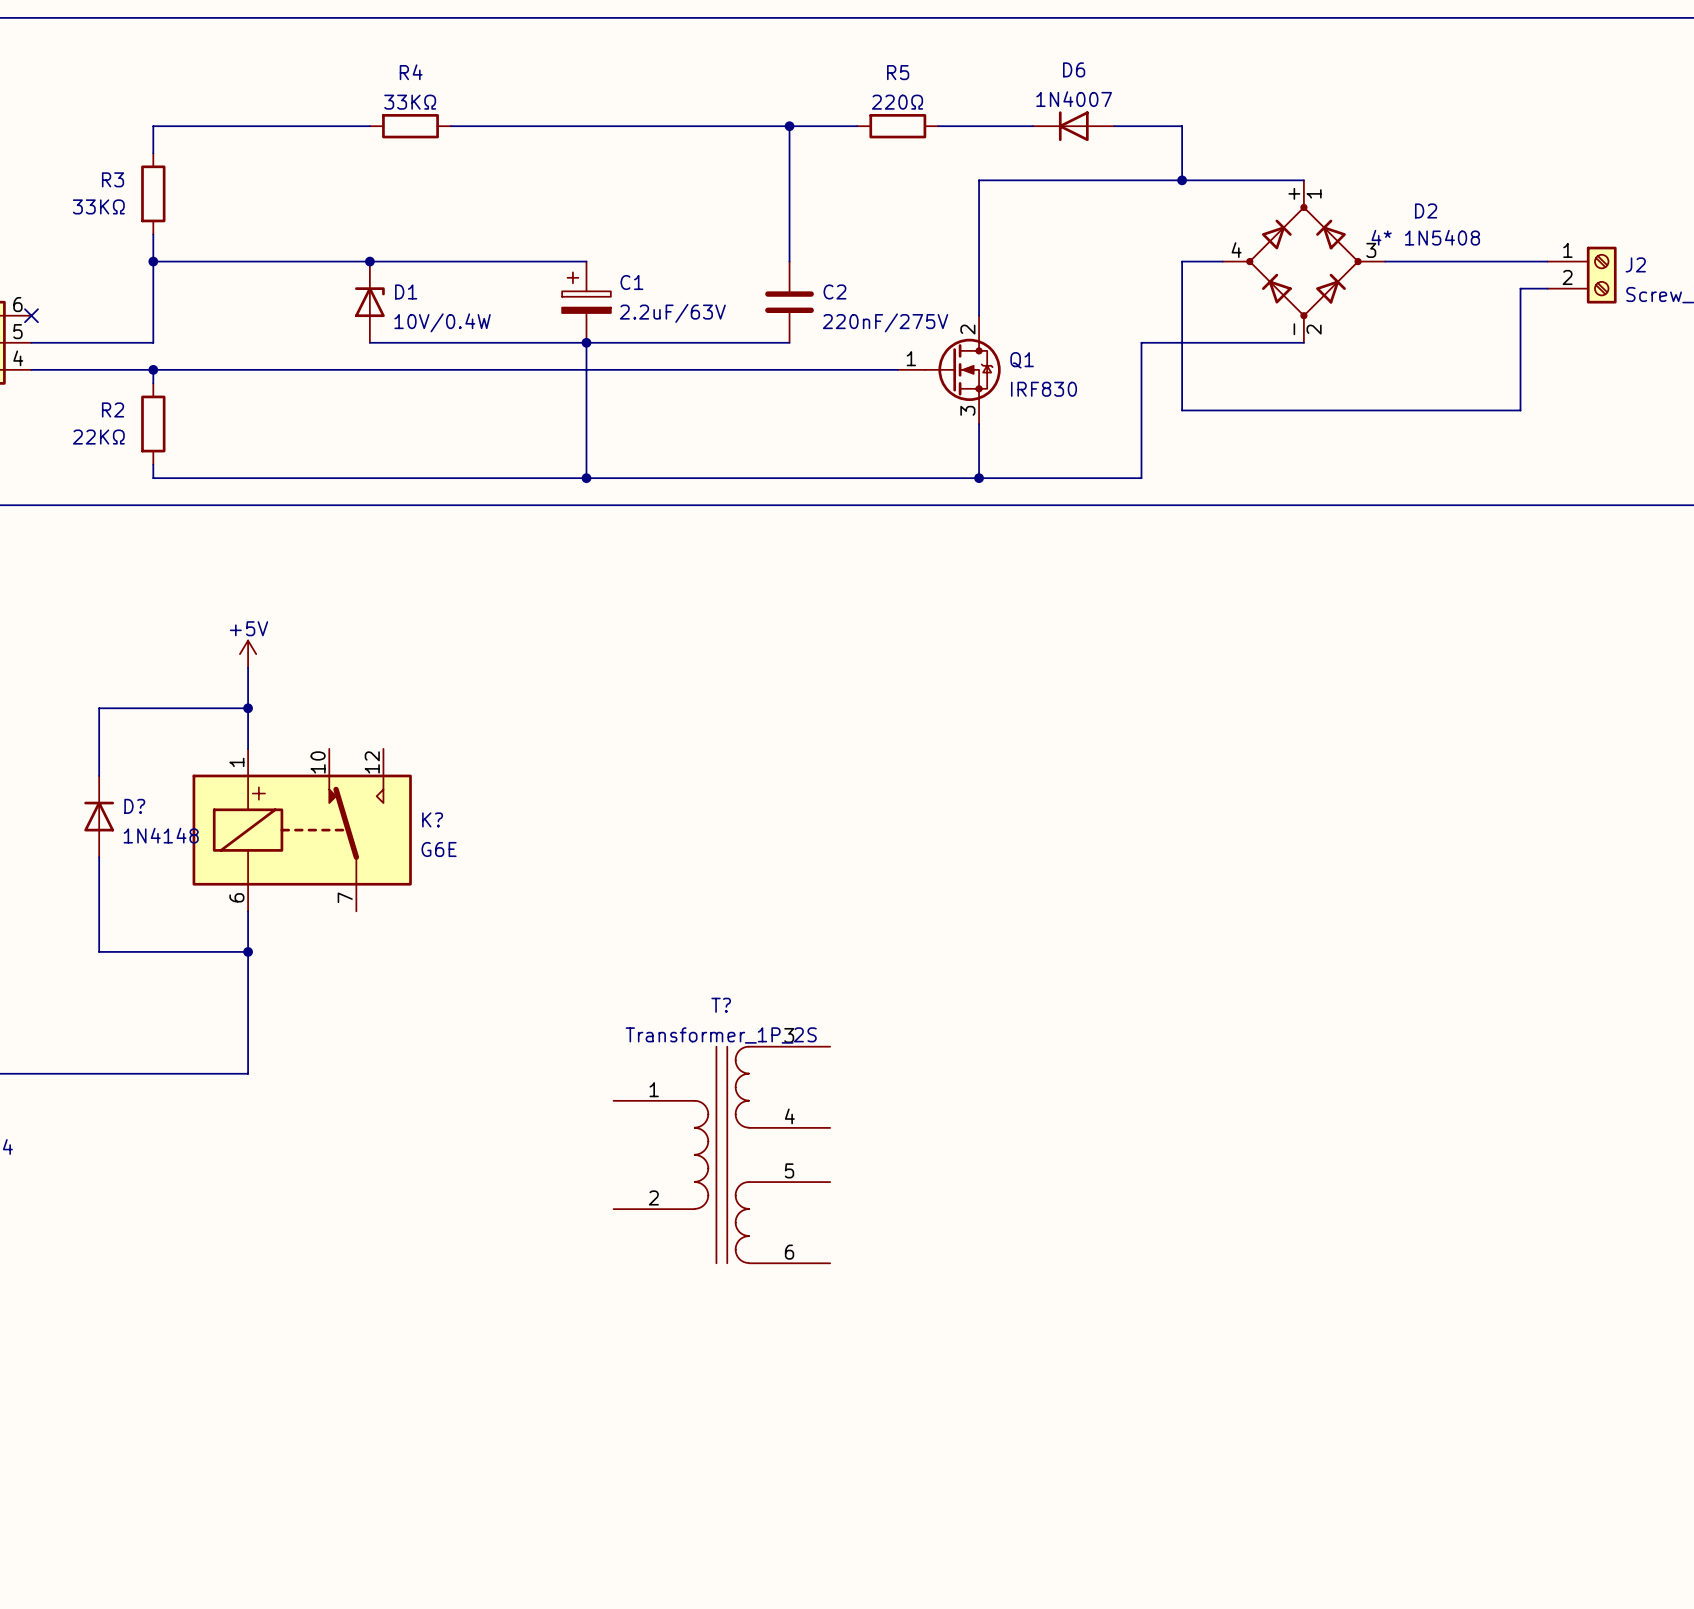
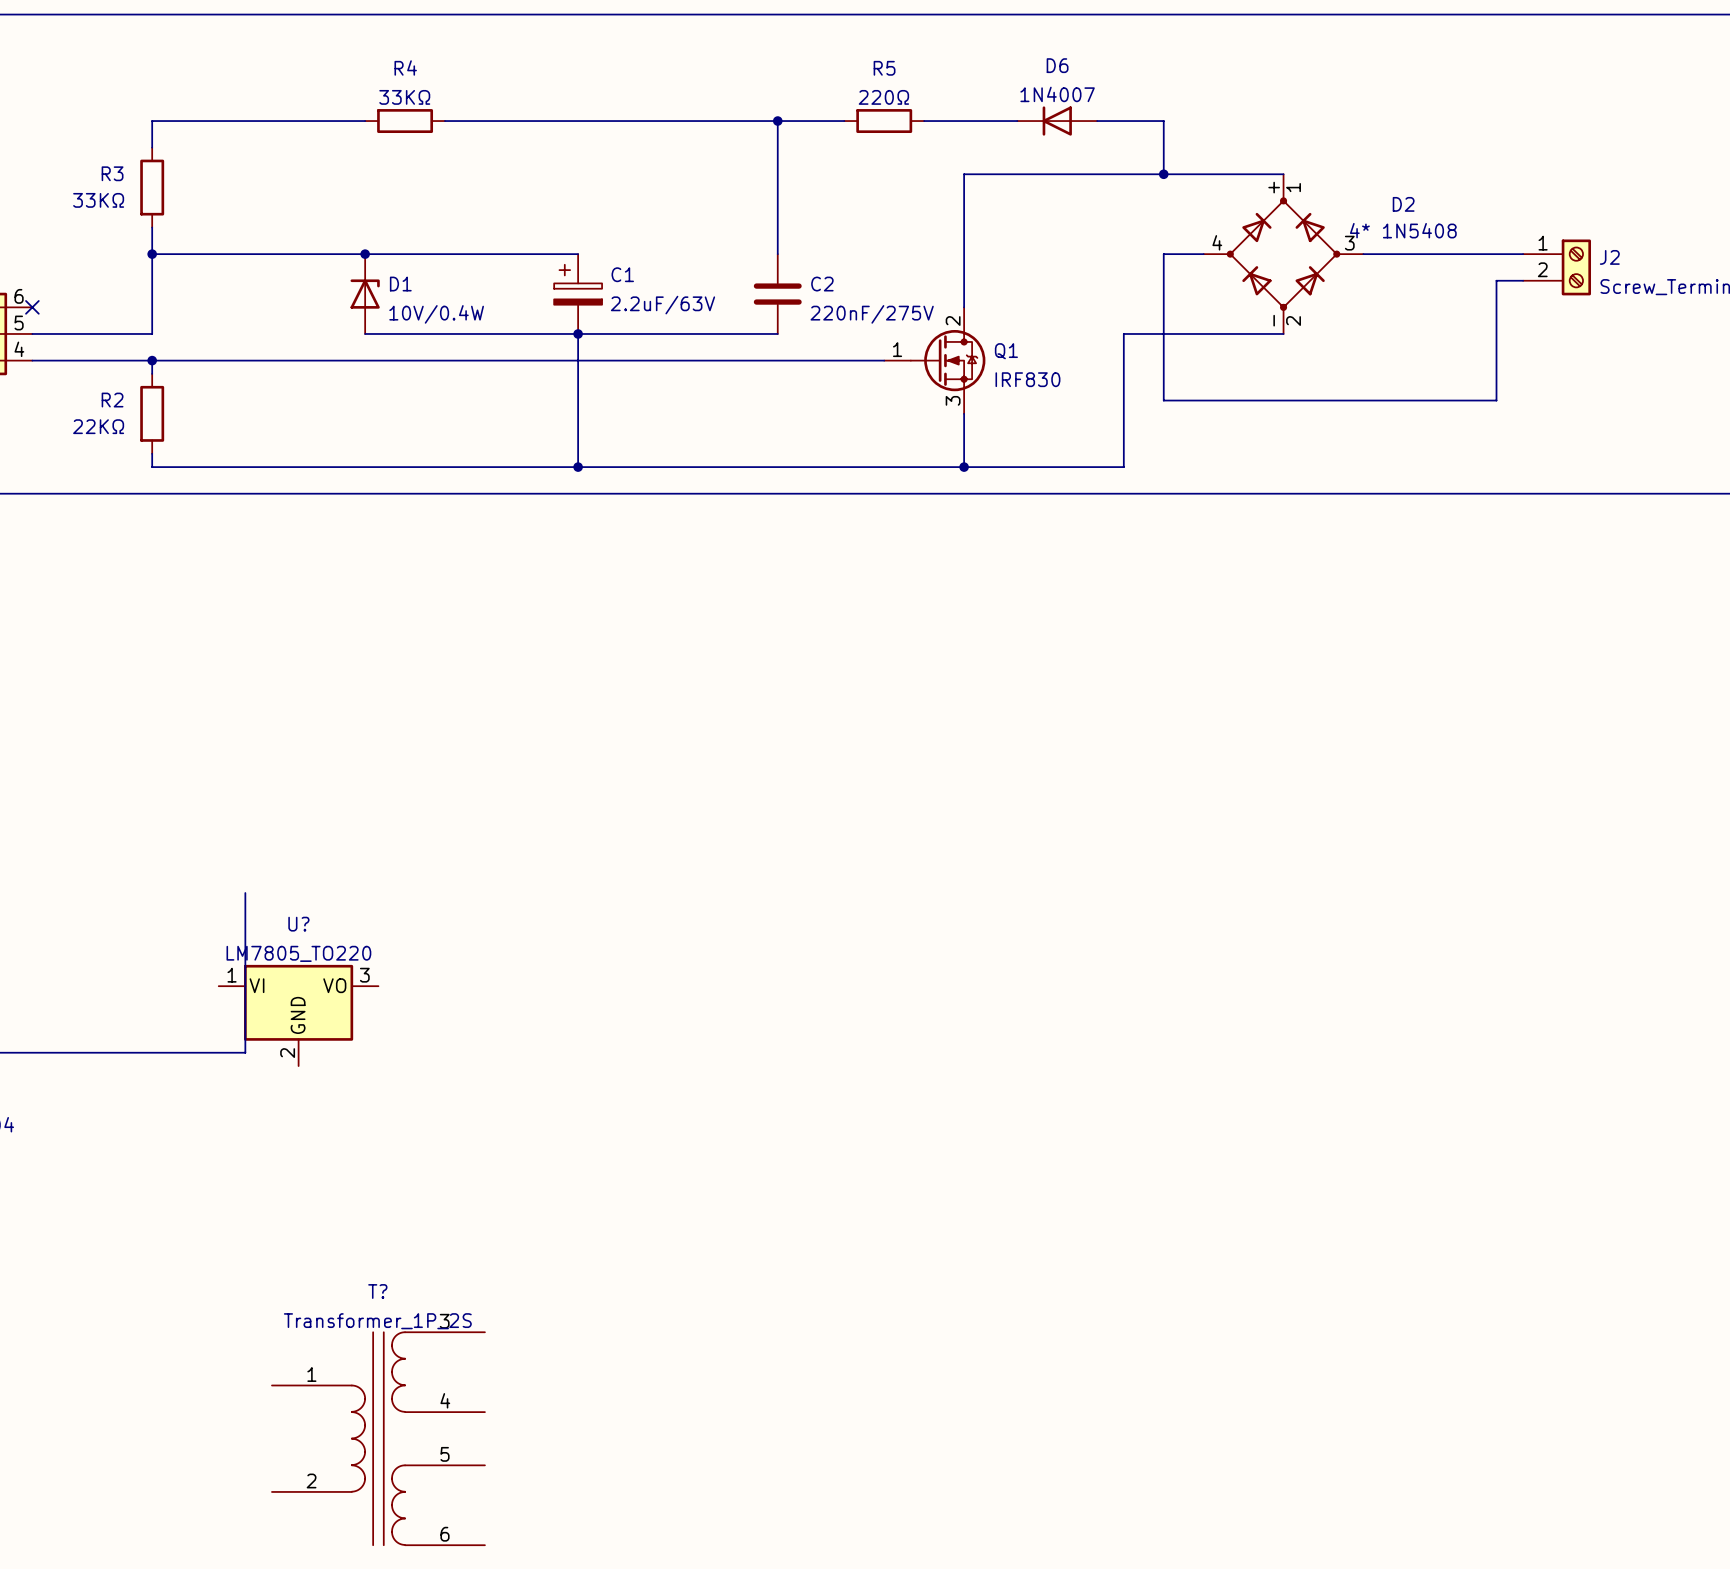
power symbol: +5V (248, 654) -> none
wire: (248, 667) (248, 748) -> none
wire: (248, 708) (99, 708) (99, 775) -> none
junction: (248, 708) -> none
D?: 1N4148 (99, 816) -> none
K?: G6E (302, 830) -> none
wire: (99, 857) (99, 951) (248, 951) -> none
junction: (248, 951) -> none
U?: none -> LM7805_TO220 (298, 1015)
T?: Transformer_1P_2S (721, 1154) -> none
T?: none -> Transformer_1P_2S (378, 1438)

